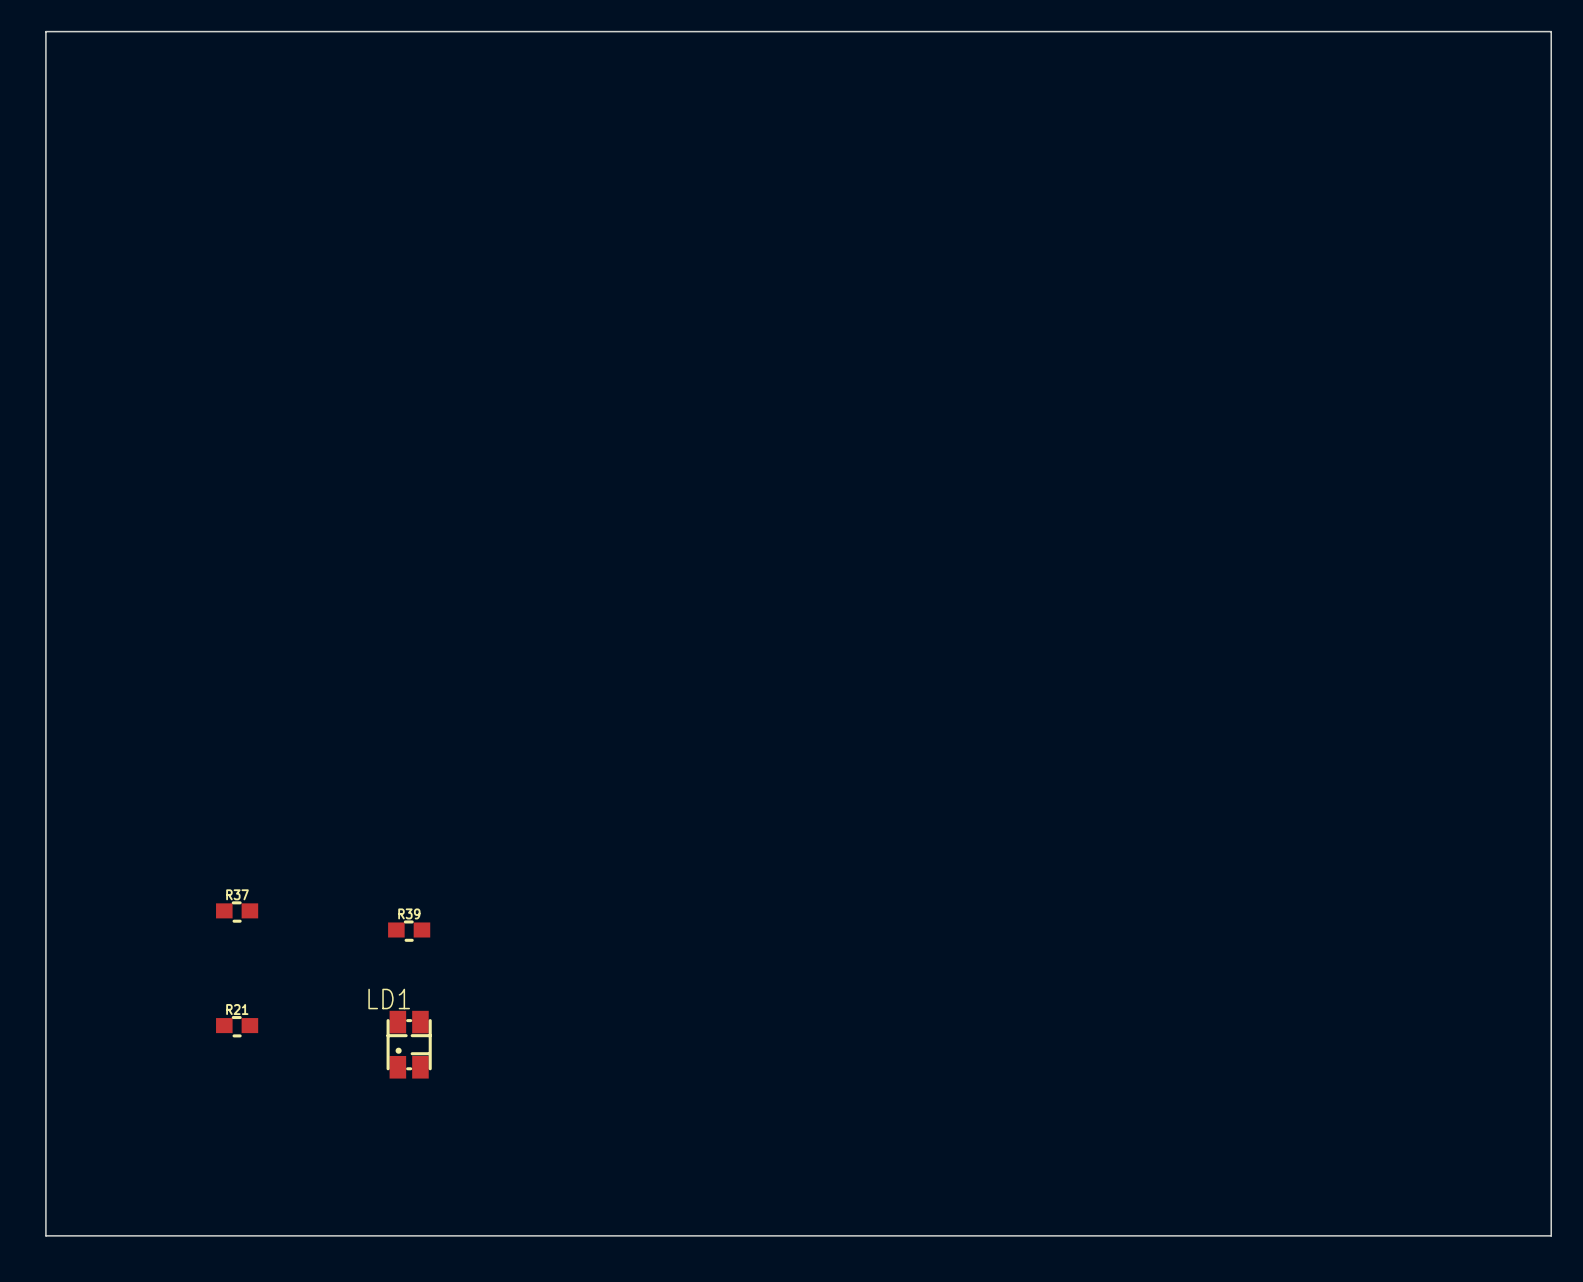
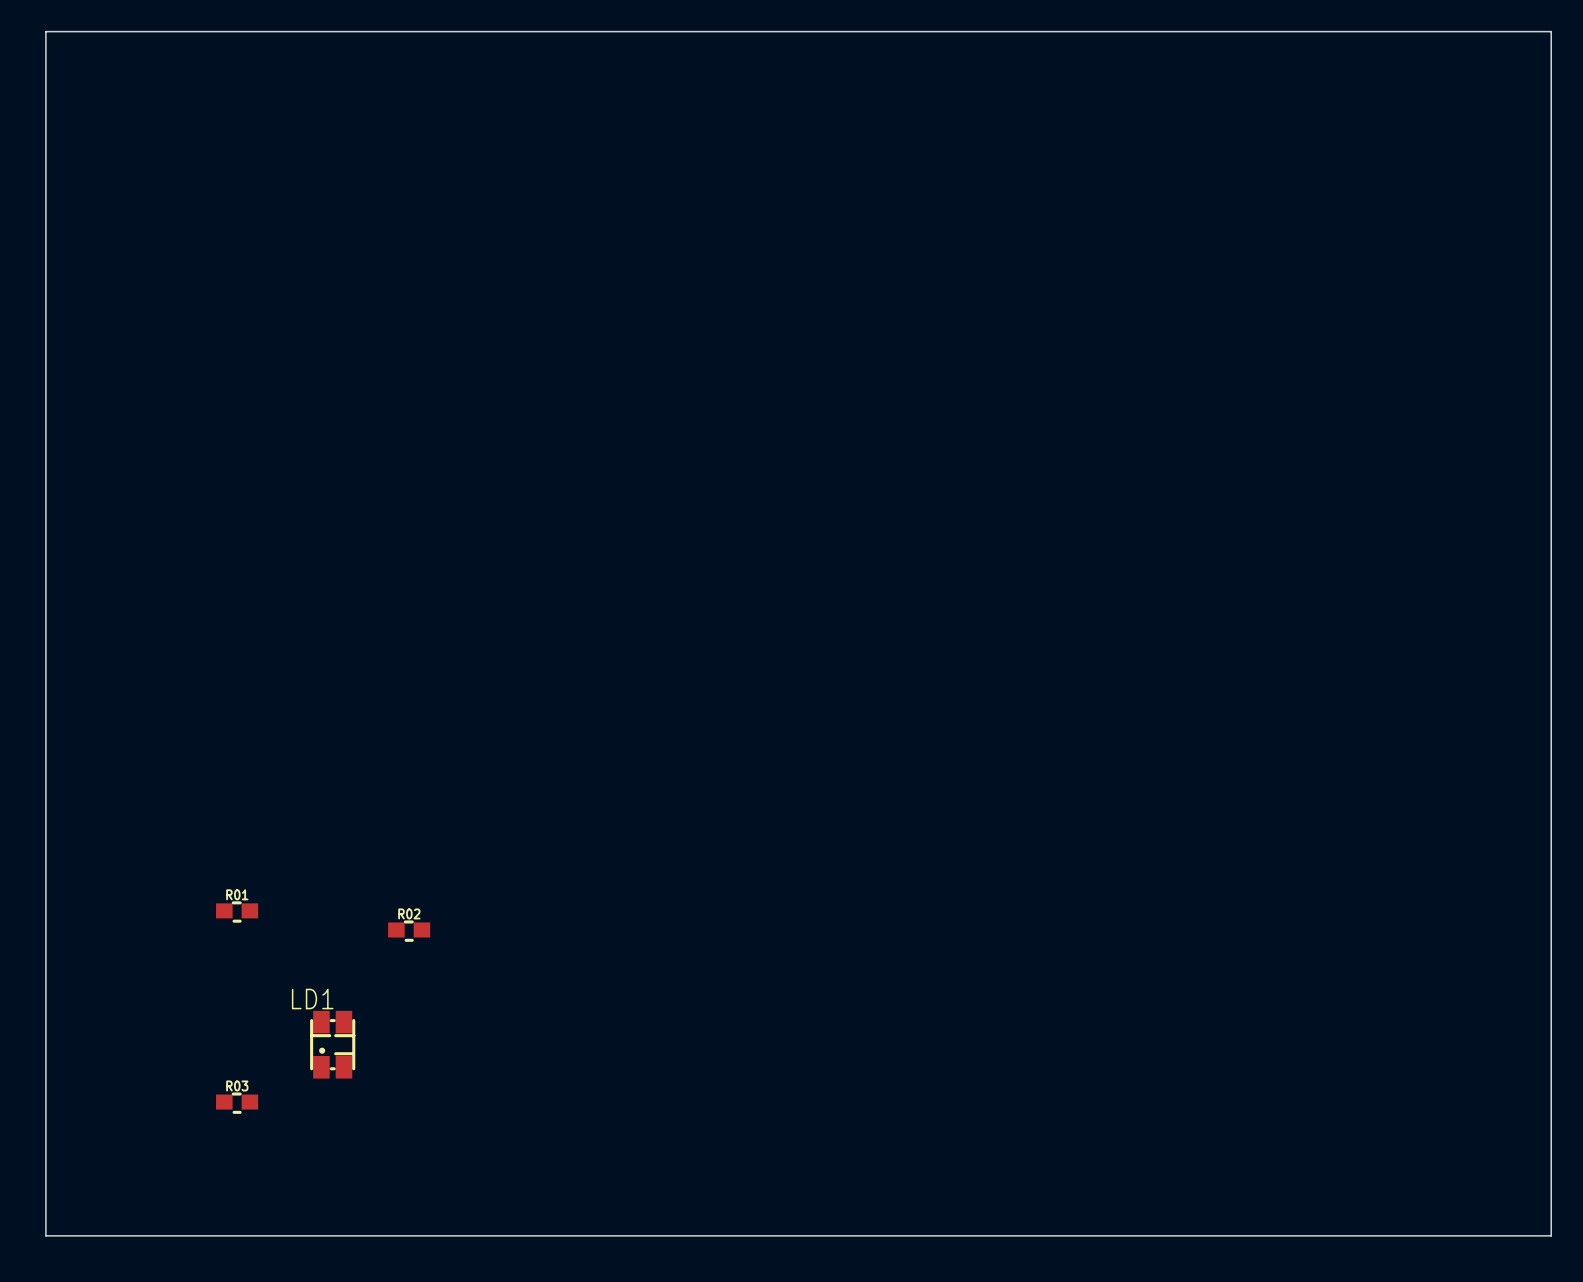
R37 name: R37 (237, 894) -> R01 (237, 894)
R39 name: R39 (409, 913) -> R02 (409, 913)
R21: (237, 1026) -> none
LD1 position: (409, 1044) -> (332, 1044)
R03: none -> (237, 1103)

